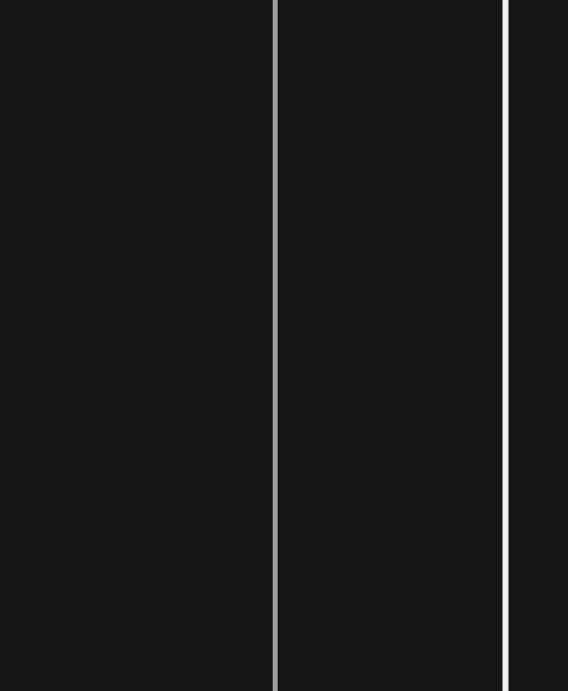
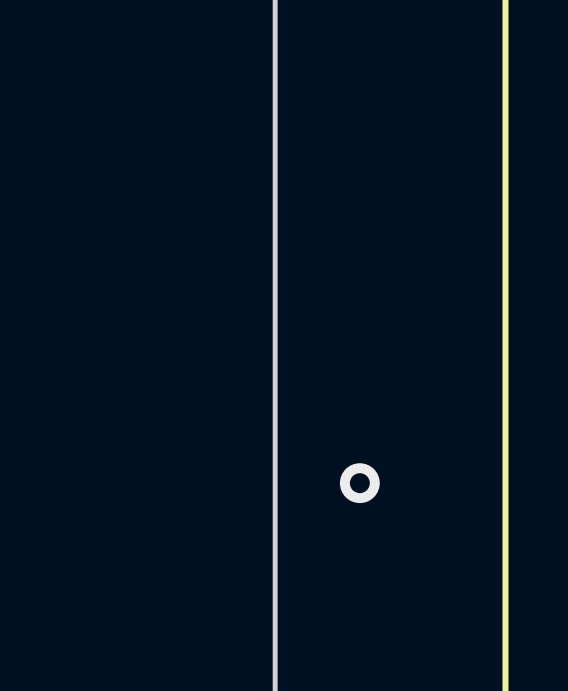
via: none -> (359, 483)

